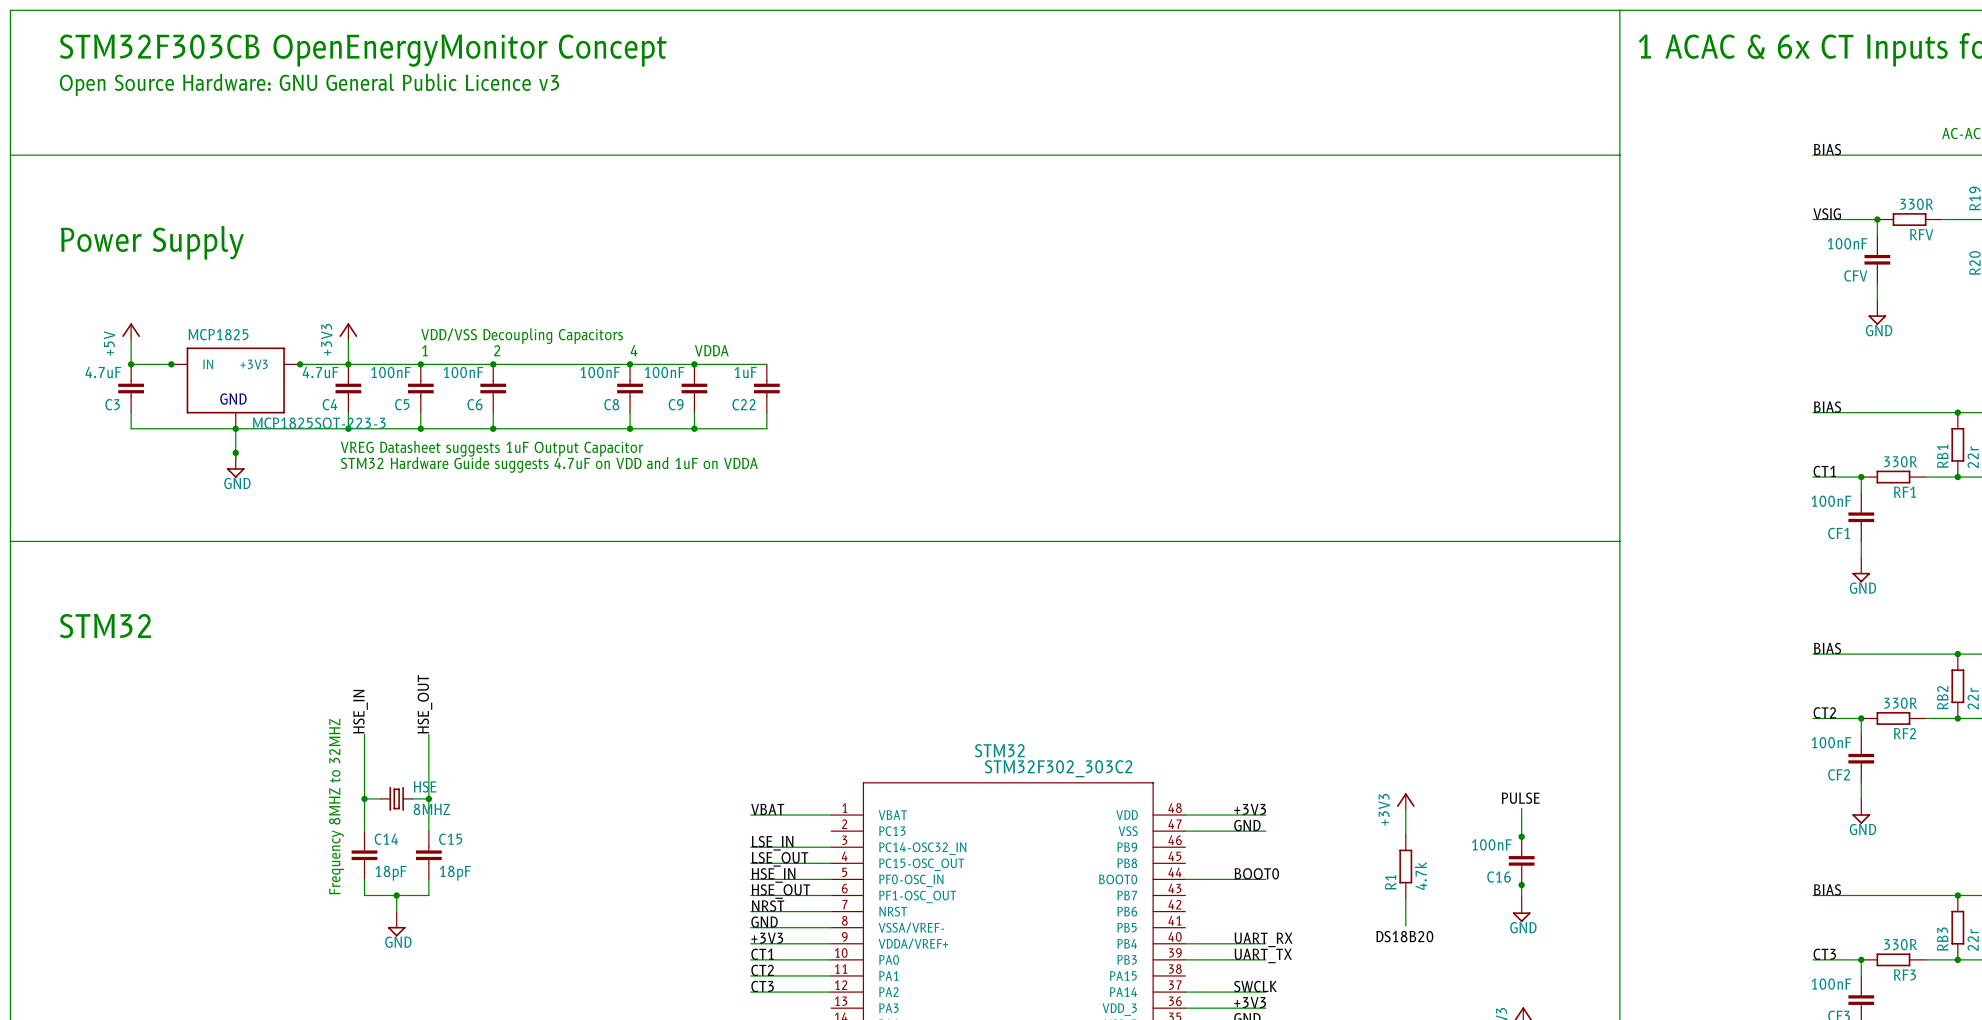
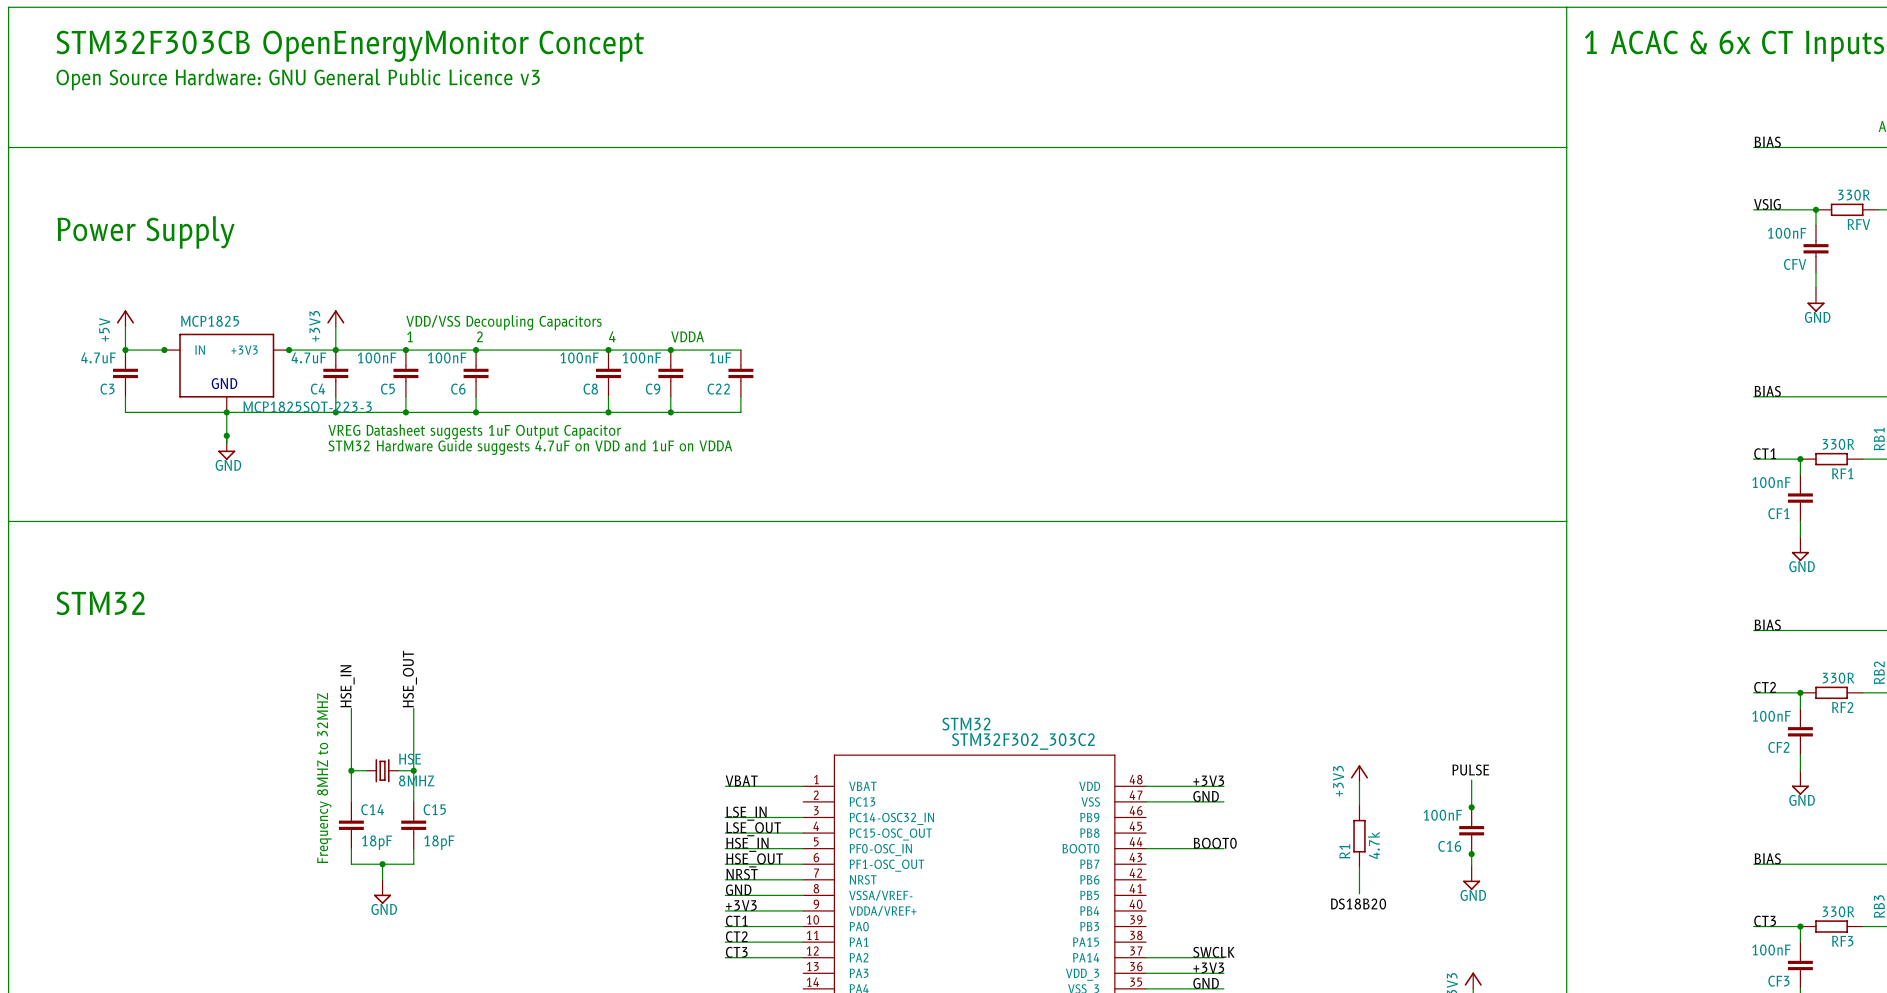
label: UART_RX (1263, 939) -> none
wire: (1185, 943) (1265, 943) -> none
label: UART_TX (1263, 955) -> none
wire: (1185, 959) (1265, 959) -> none

